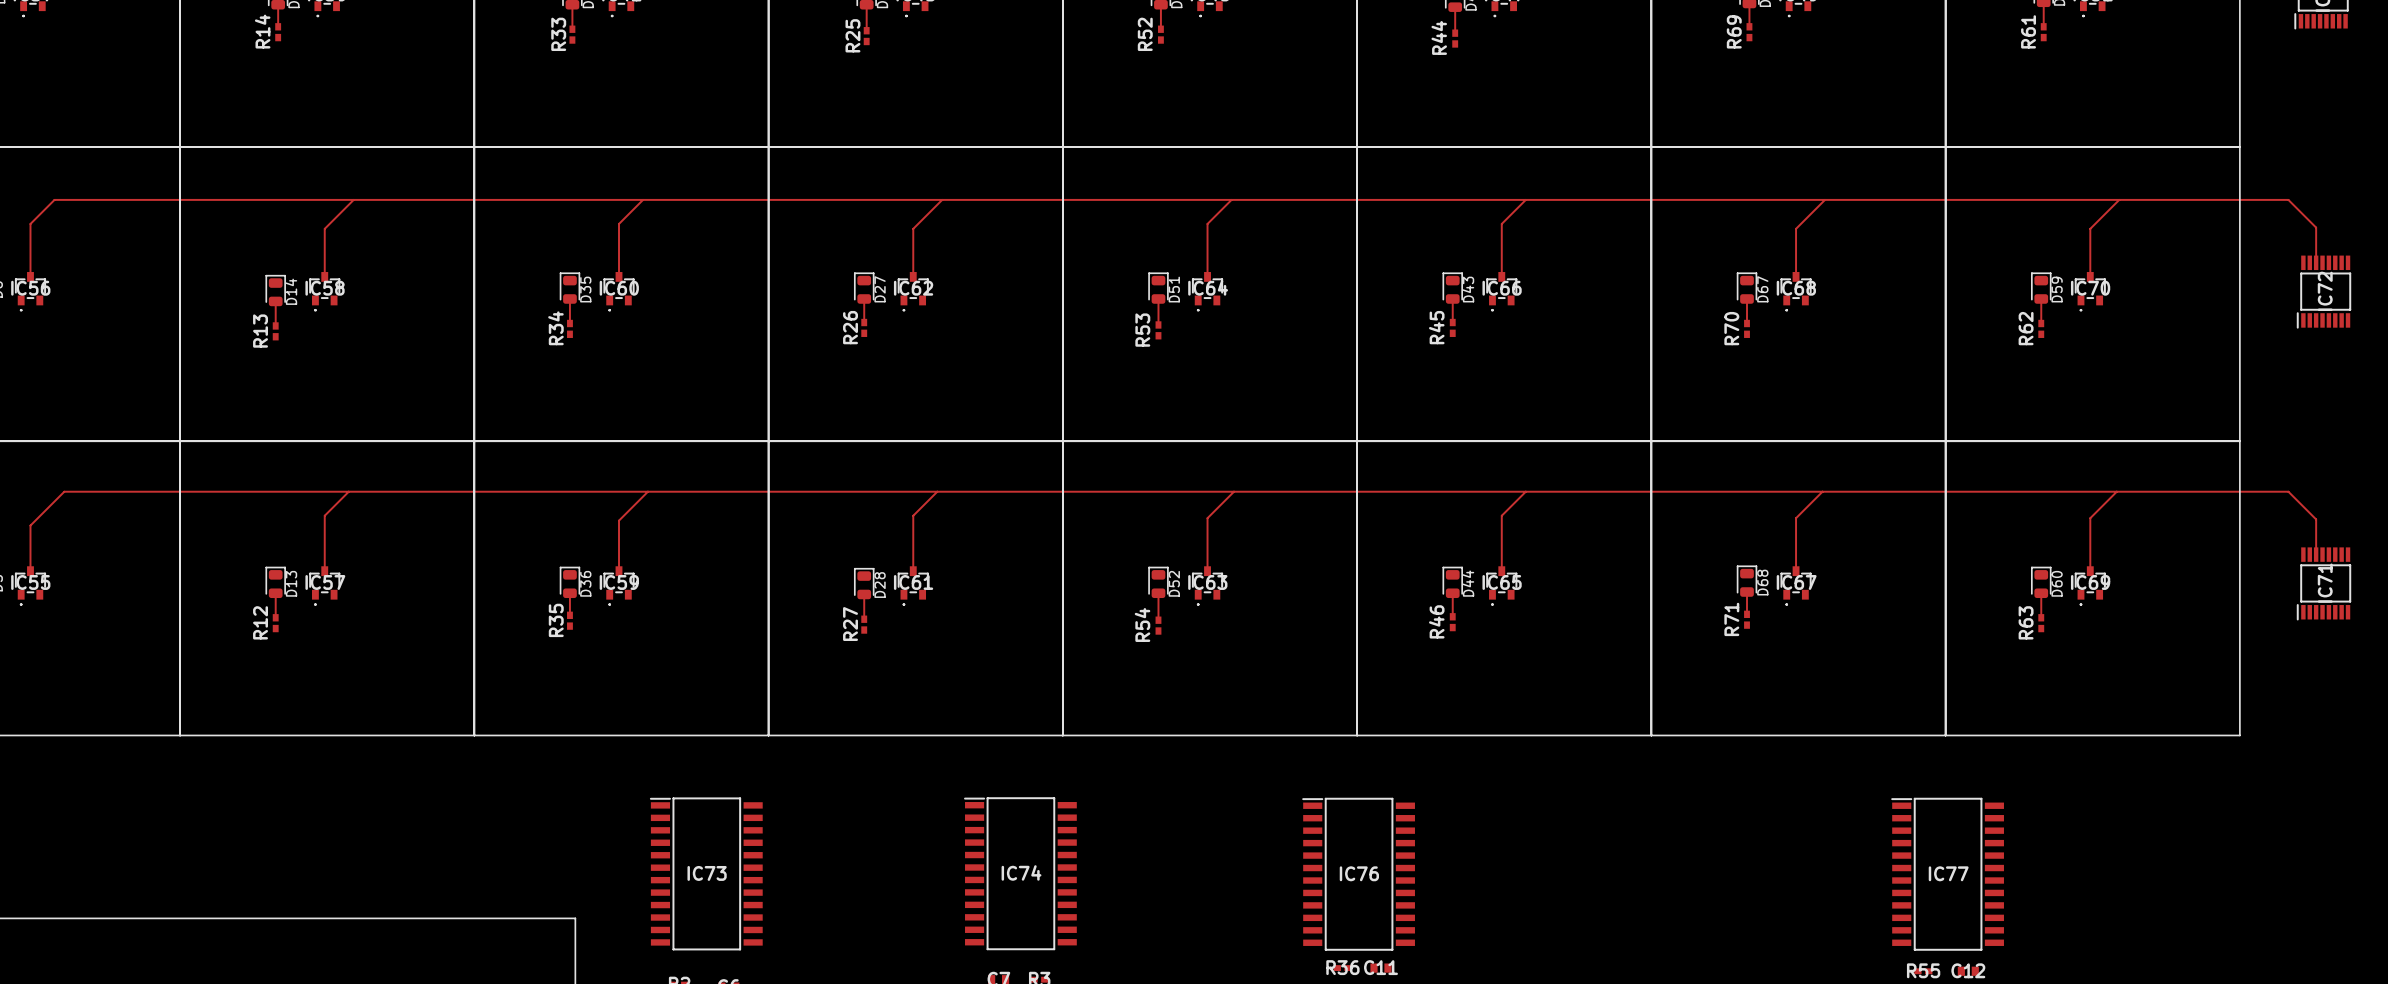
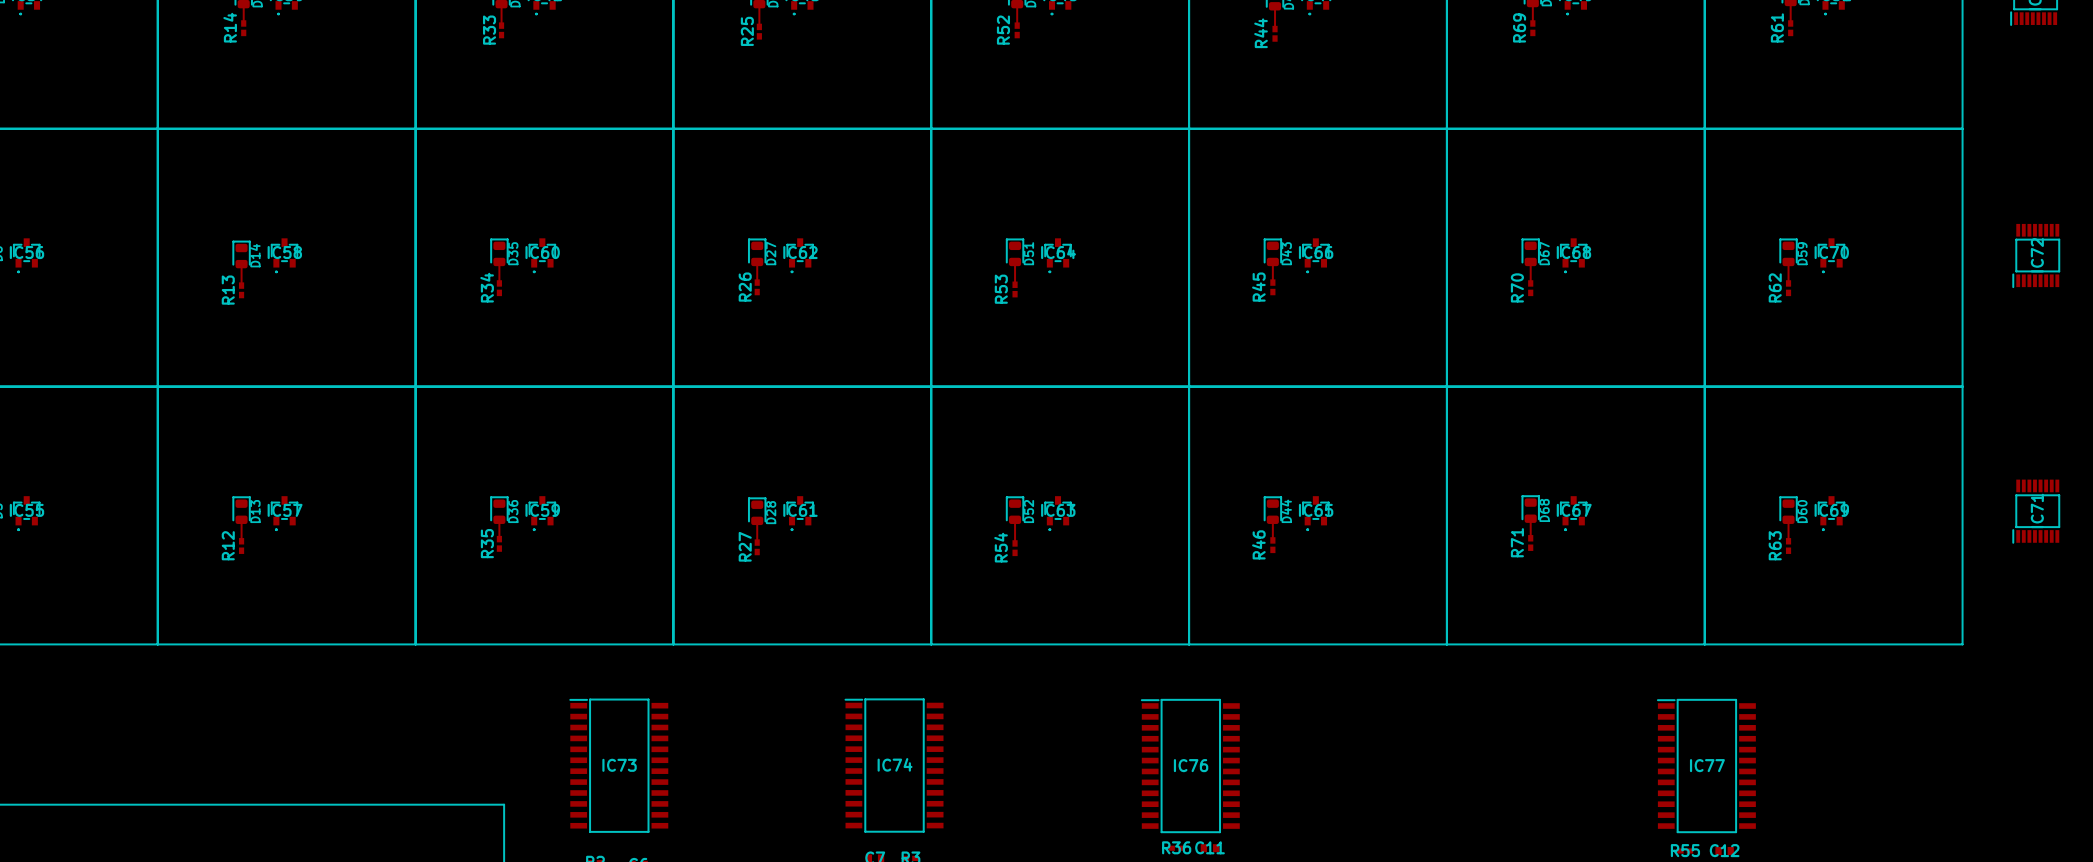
top track: (353, 199) (324, 228) (324, 276) -> none
top track: (643, 199) (619, 223) (619, 276) -> none
top track: (942, 199) (913, 228) (913, 276) -> none
top track: (1231, 199) (1207, 223) (1207, 276) -> none
top track: (1525, 199) (1501, 223) (1501, 276) -> none
top track: (1824, 199) (1796, 228) (1796, 276) -> none
top track: (2119, 199) (2090, 228) (2090, 276) -> none
top track: (2316, 262) (2316, 227) (2288, 199) (54, 199) (30, 223) (30, 276) -> none
top track: (348, 491) (324, 515) (324, 571) -> none
top track: (647, 491) (619, 520) (619, 571) -> none
top track: (937, 491) (913, 515) (913, 571) -> none
top track: (1234, 491) (1207, 518) (1207, 571) -> none
top track: (1525, 491) (1501, 515) (1501, 571) -> none
top track: (1822, 491) (1796, 518) (1796, 571) -> none
top track: (2116, 491) (2090, 518) (2090, 571) -> none
top track: (2316, 554) (2316, 519) (2288, 491) (64, 491) (30, 525) (30, 571) -> none

